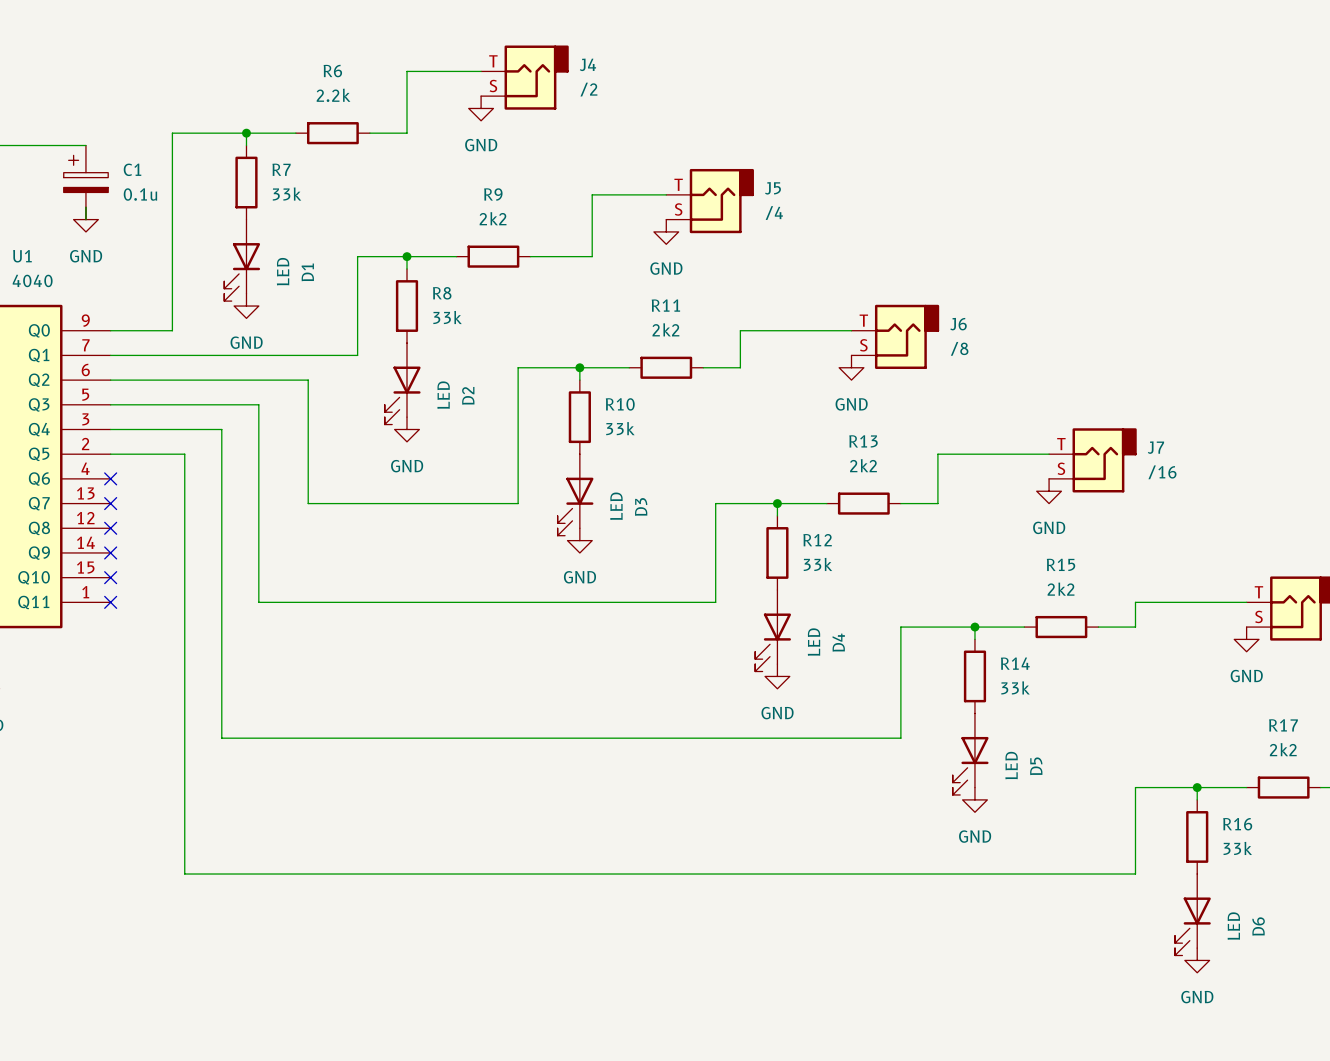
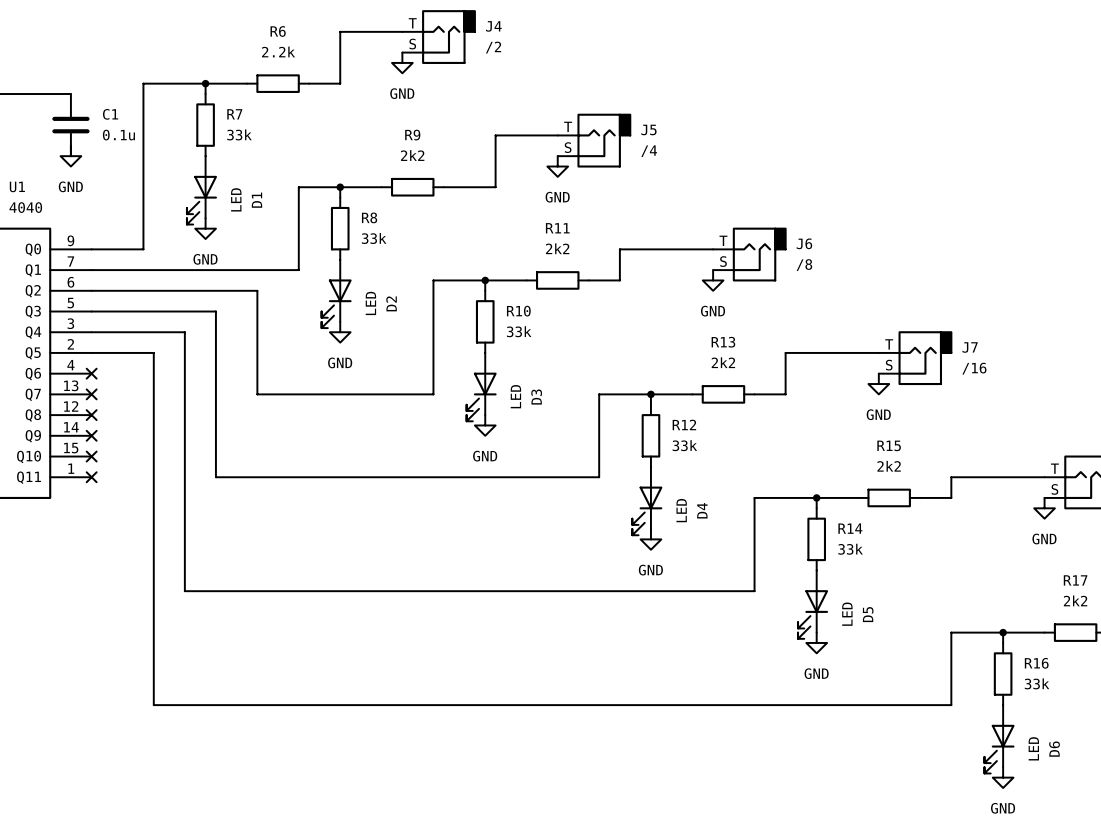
C1 symbol: [63, 145, 109, 220] -> [52, 94, 90, 157]

